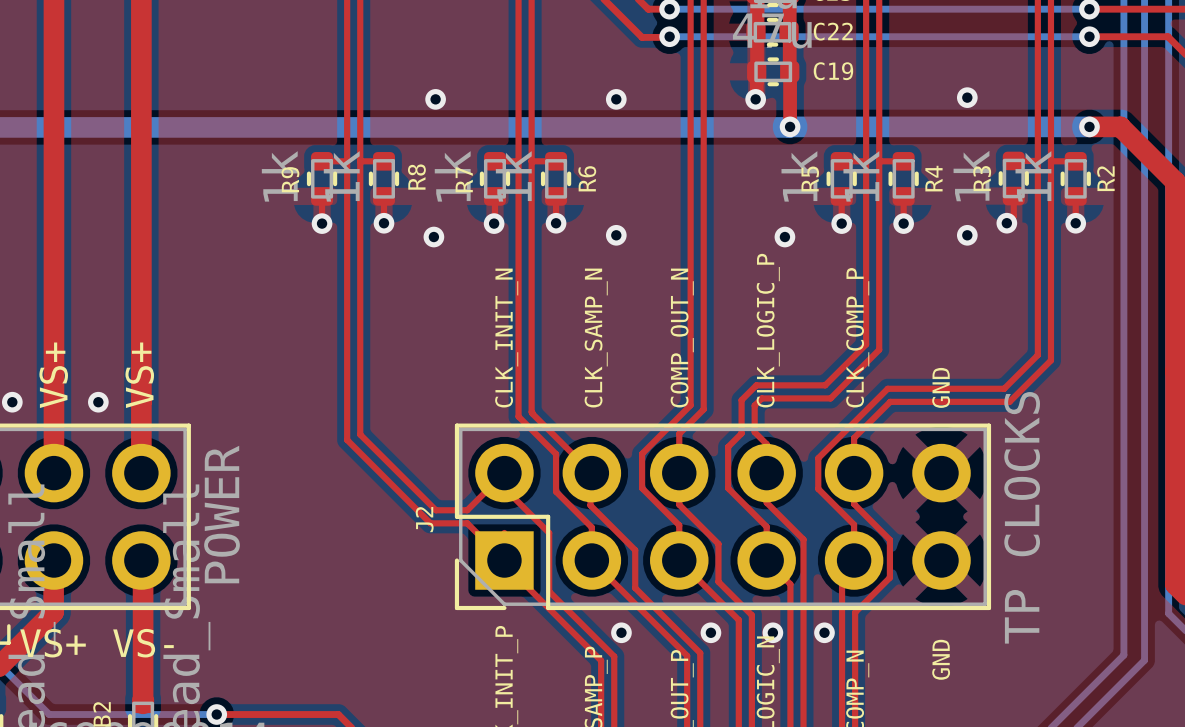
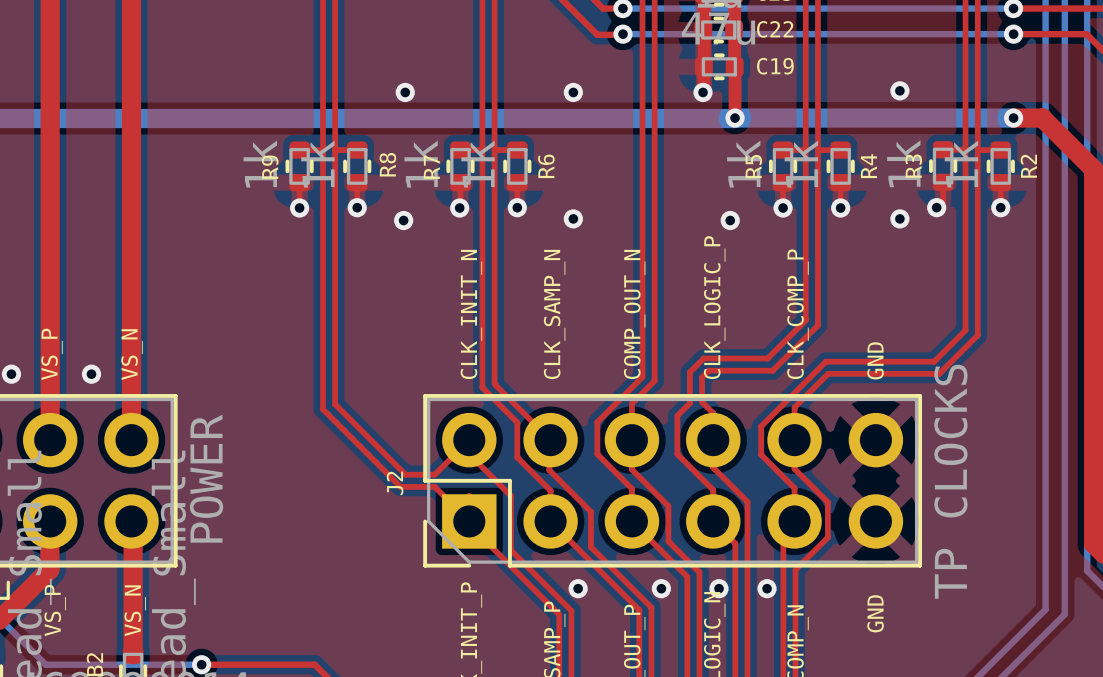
text: VS+ (53, 375) -> VS_P (51, 354)
text: VS+ (139, 375) -> VS_N (132, 354)
text: VS+ (53, 643) -> none
text: VS- (143, 643) -> none
text: none -> VS_P (55, 610)
text: none -> VS_N (135, 610)

